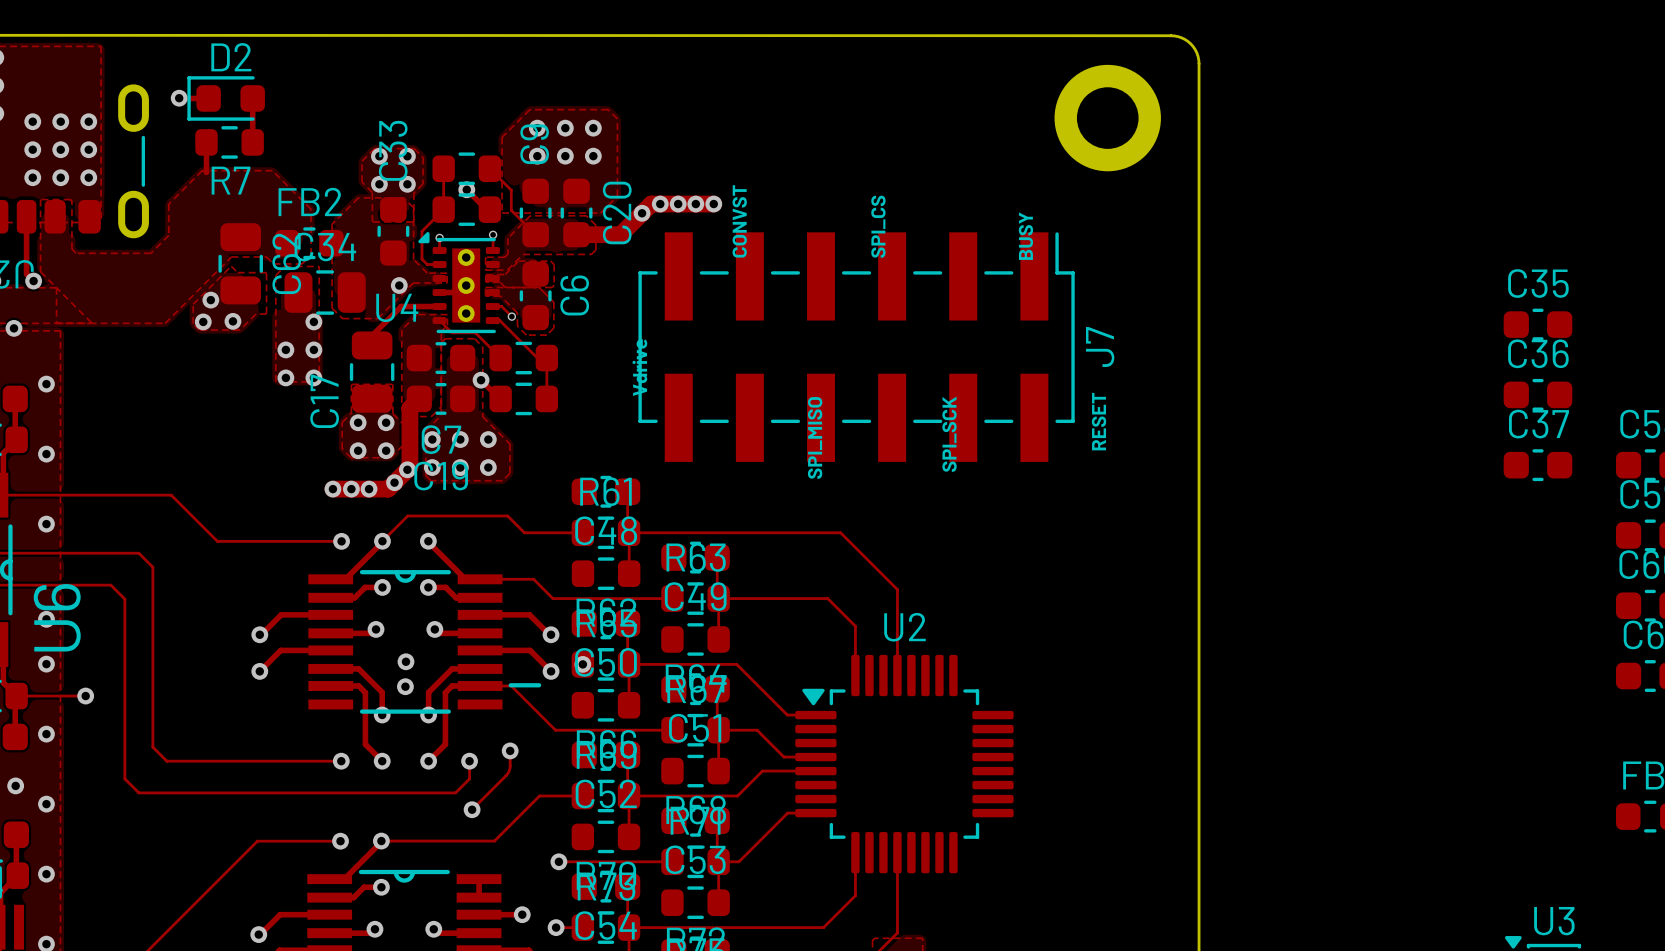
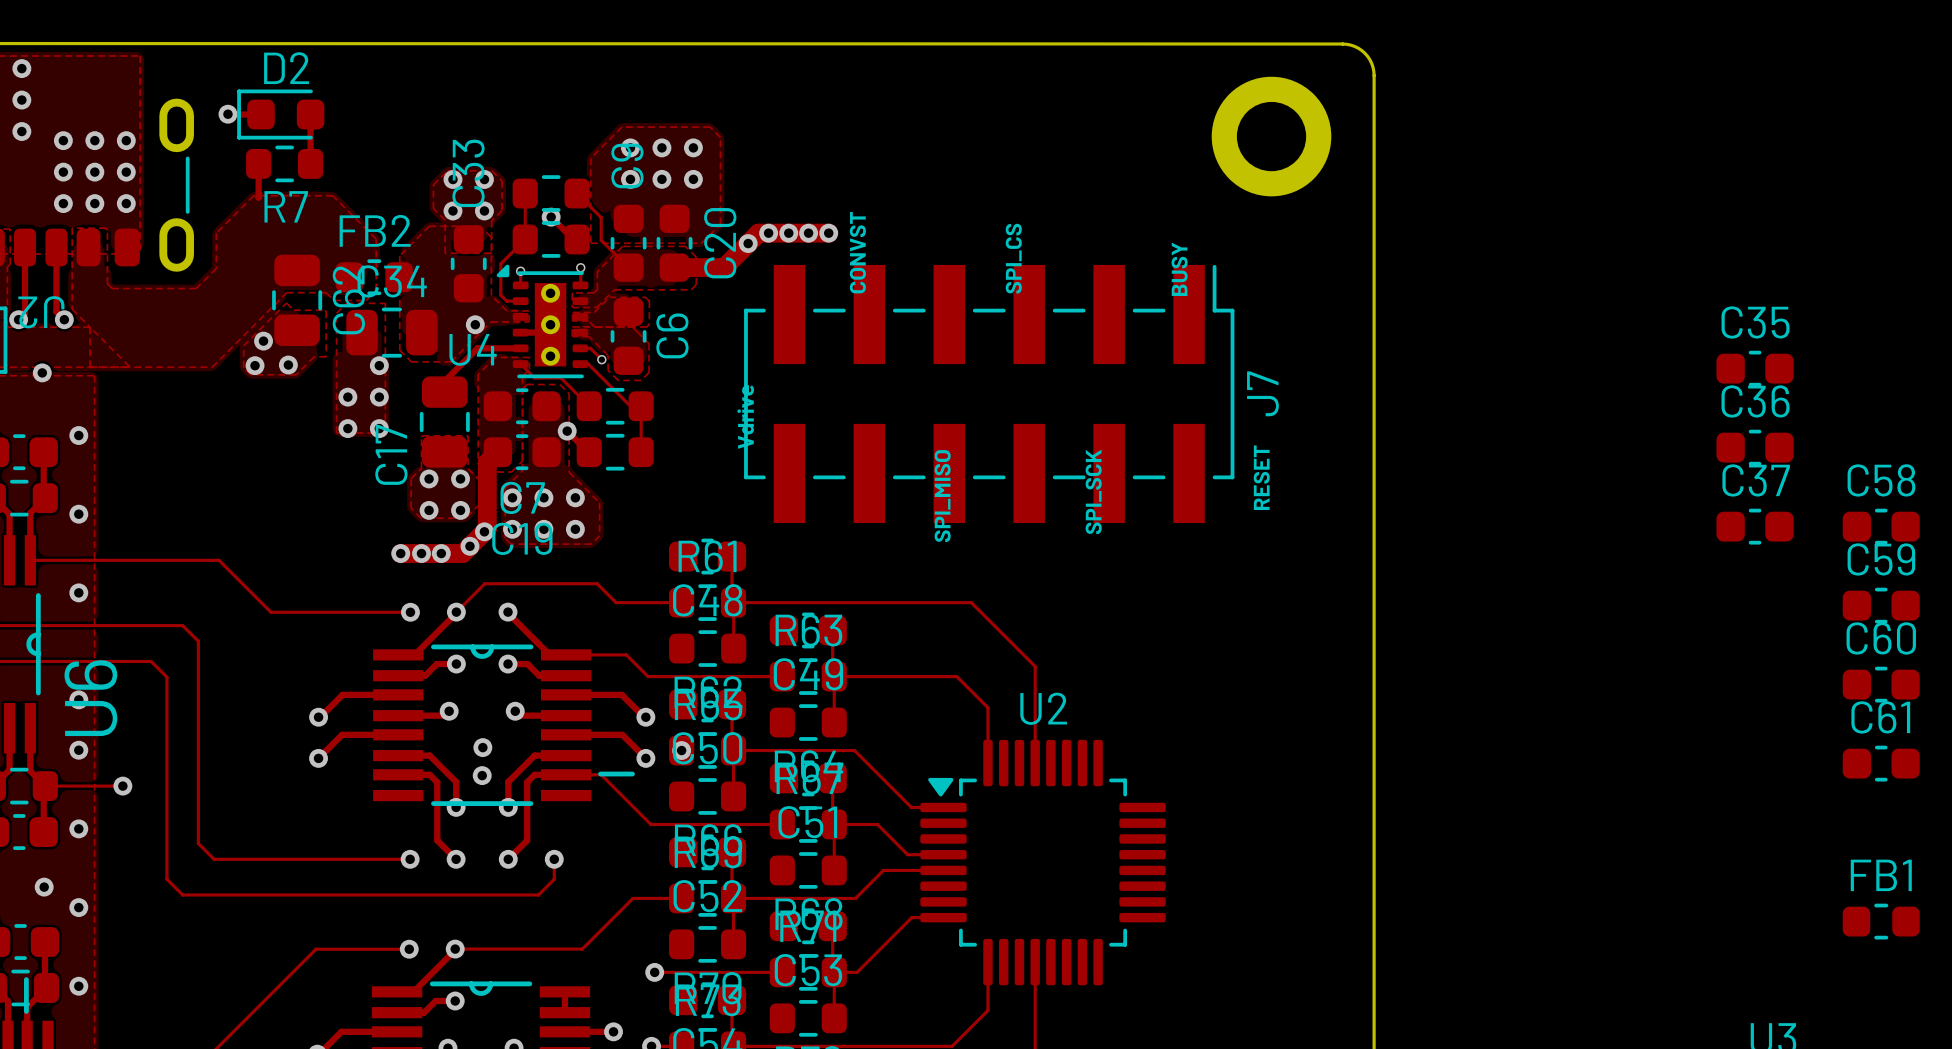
track: (510, 750) (508, 772) (472, 809) -> none
via: (510, 750) -> none
via: (472, 809) -> none

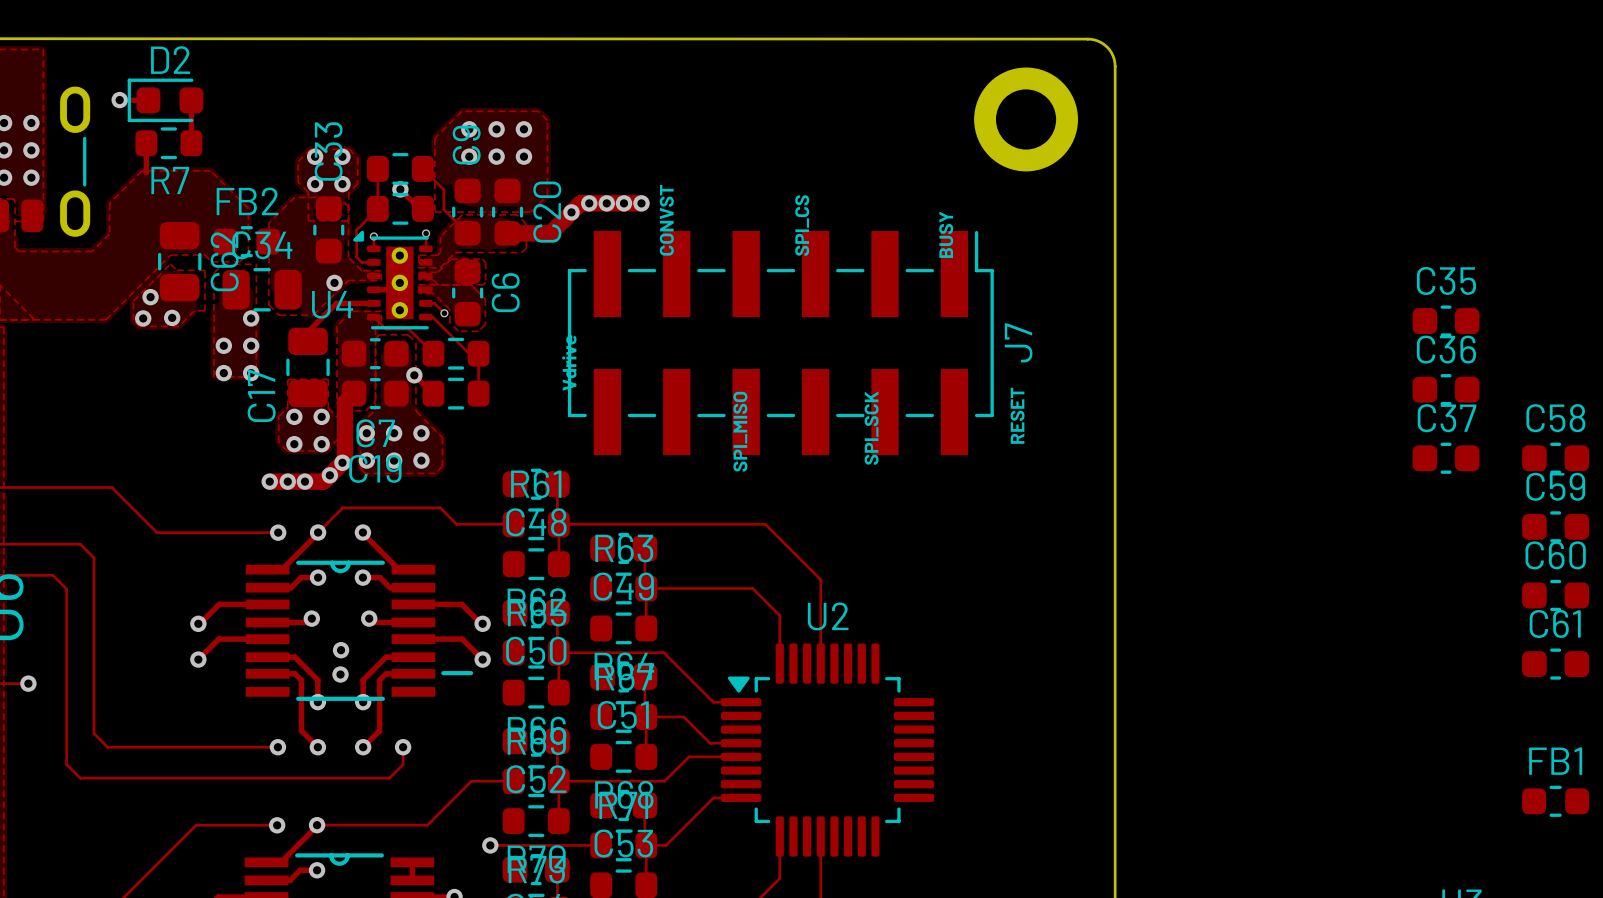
track: (566, 654) (626, 654) (648, 676) (782, 676) -> none
via: (681, 750) -> none
track: (566, 774) (601, 774) (650, 824) (782, 824) -> none

